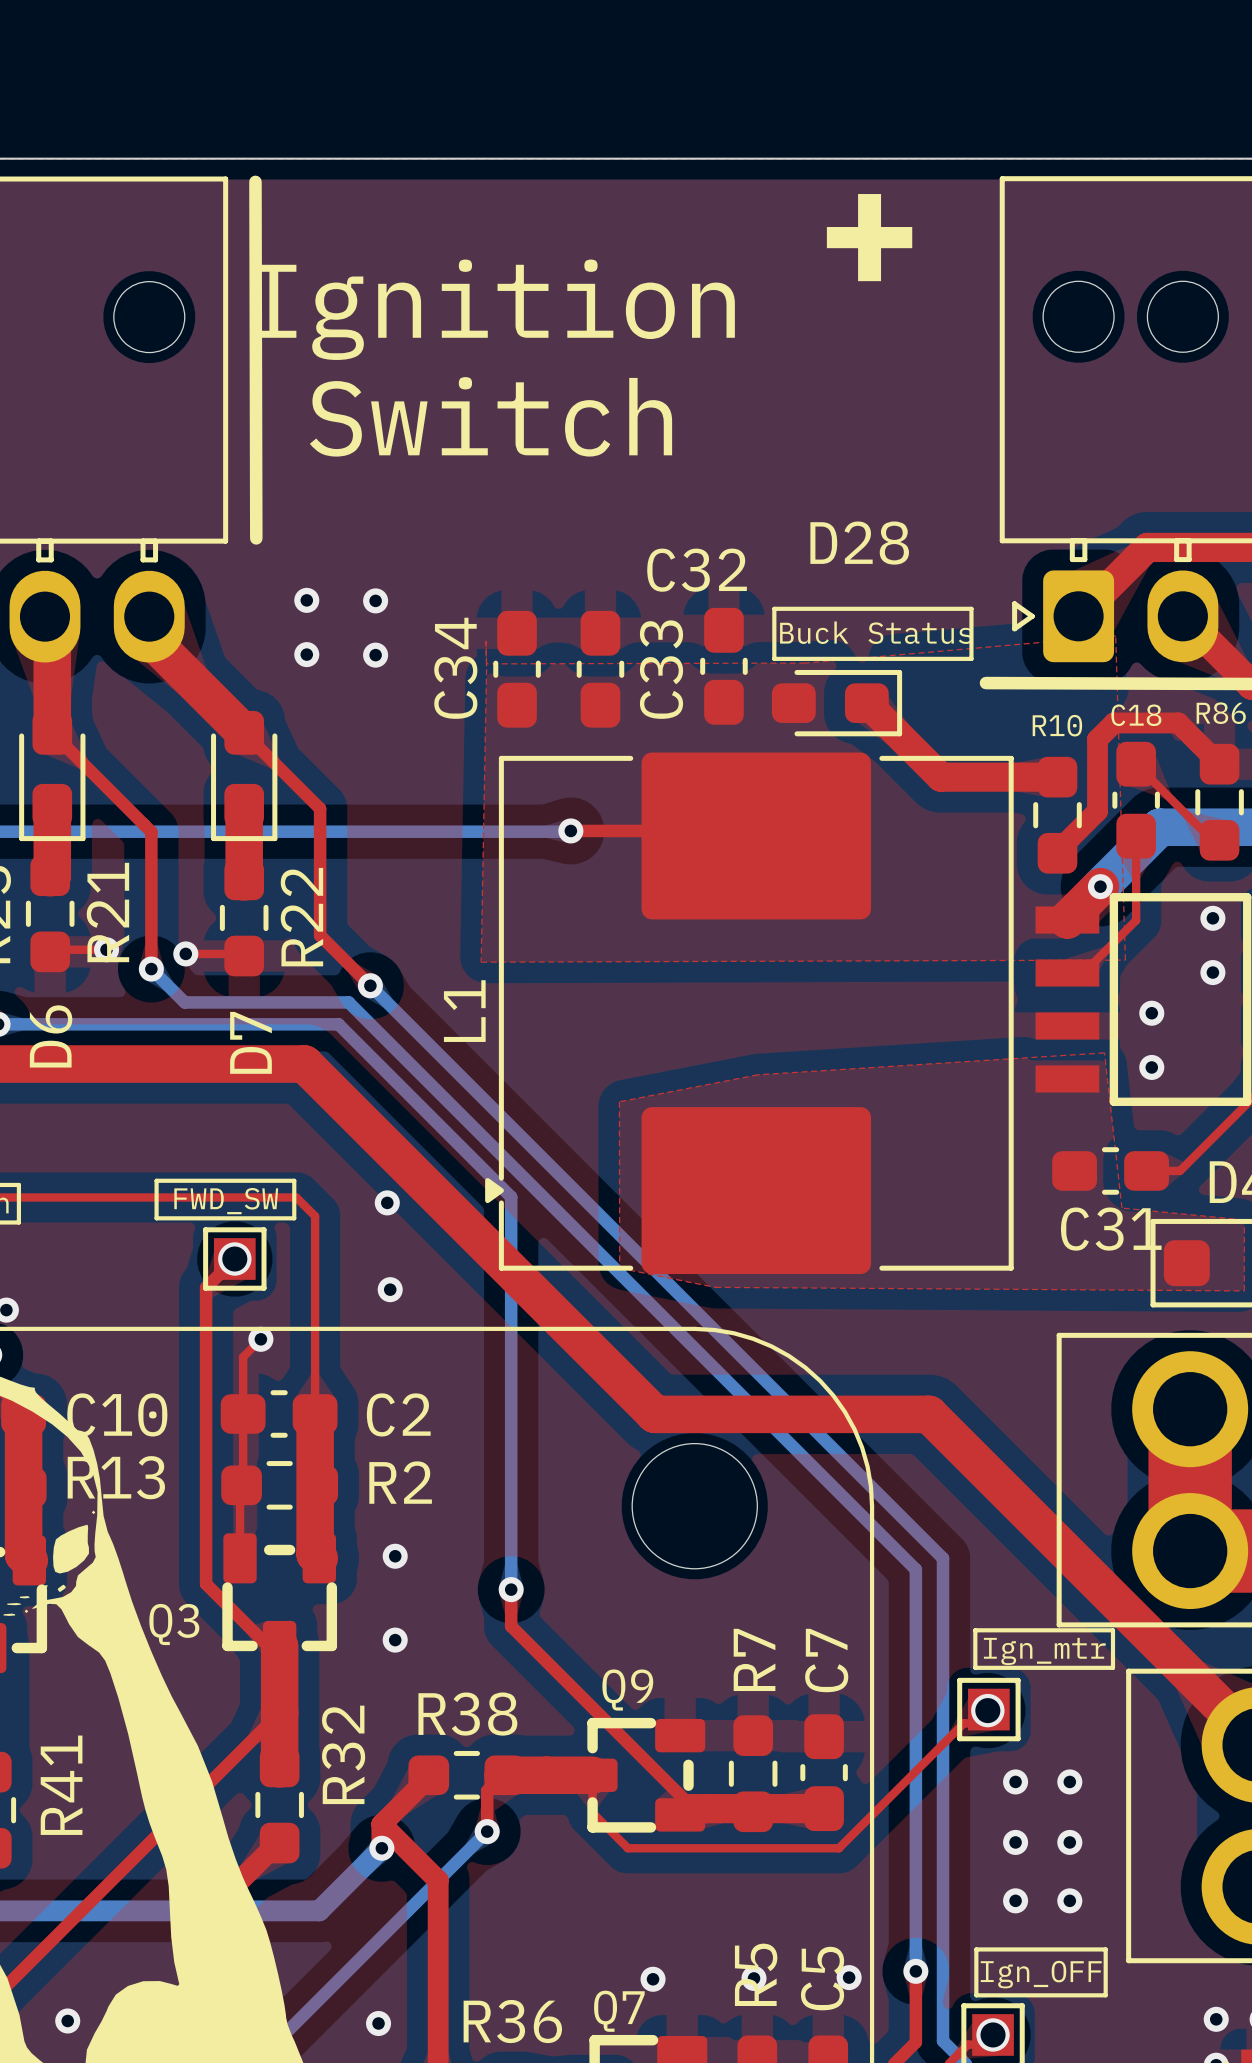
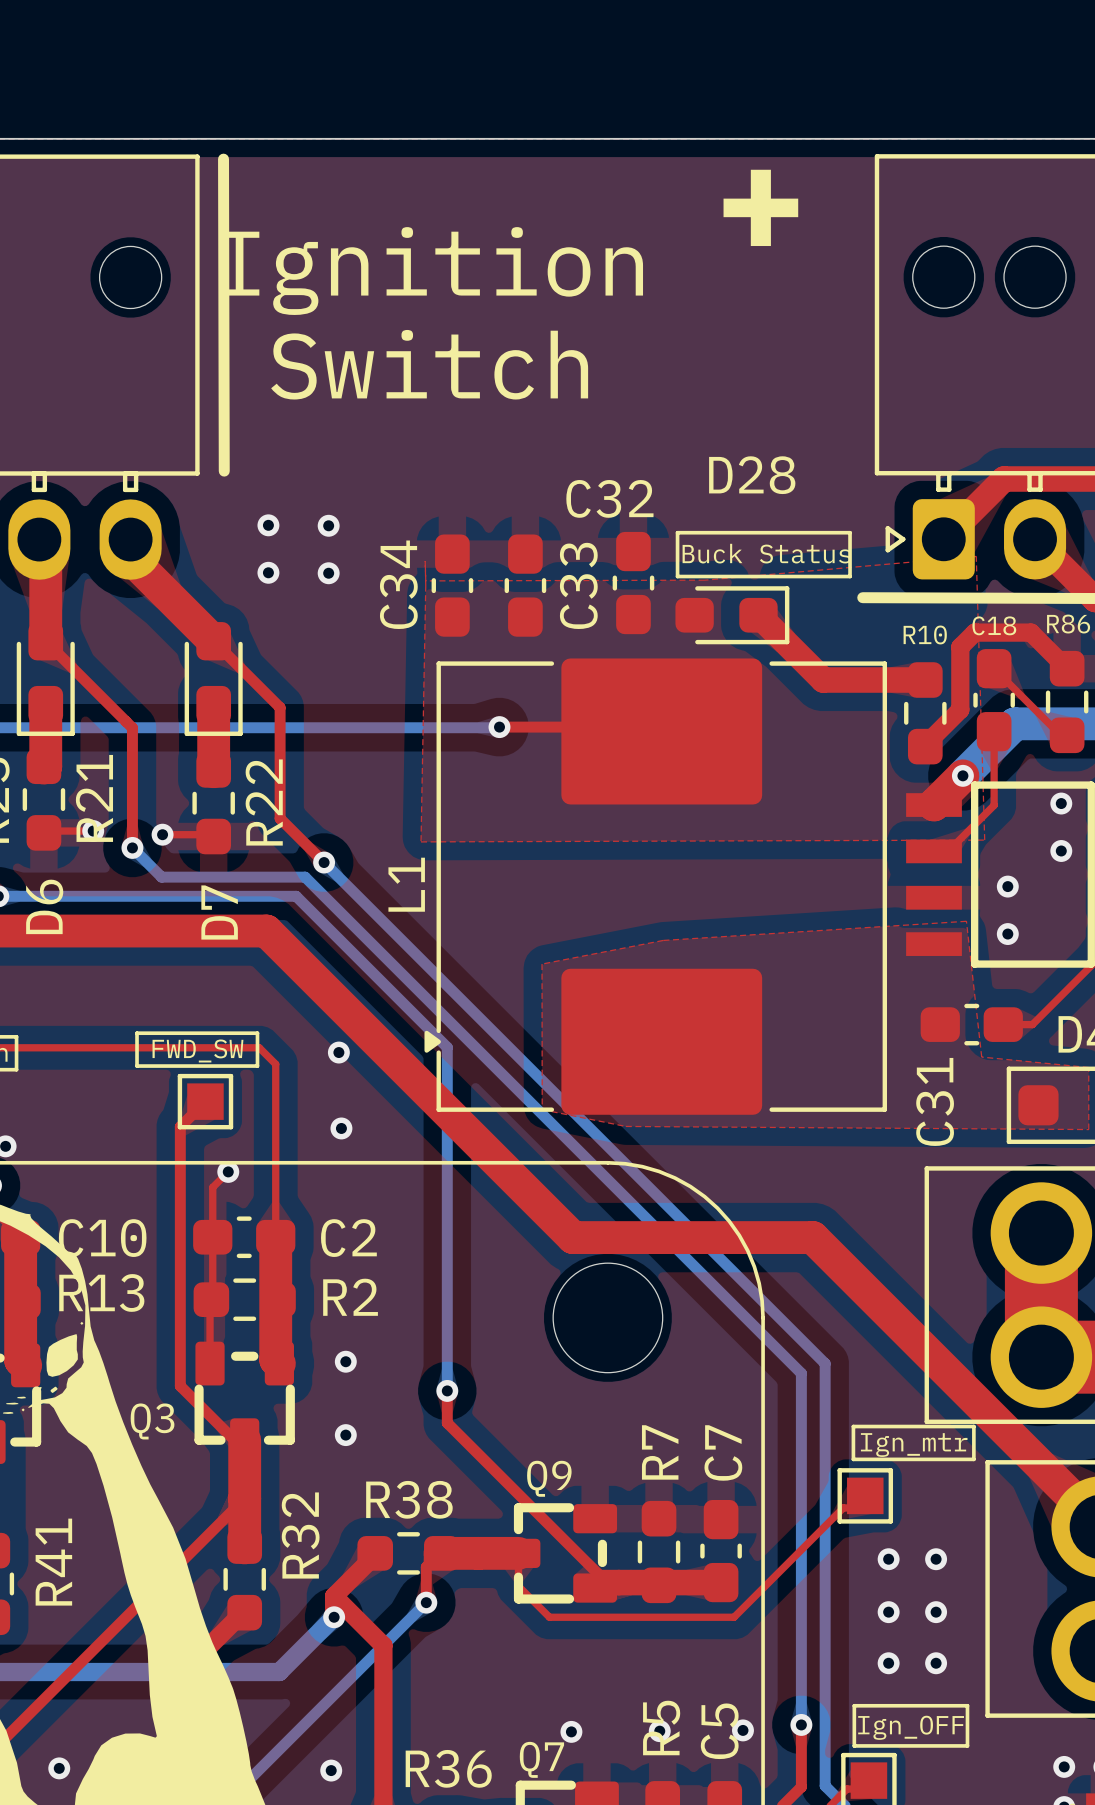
C31 name rotation: 0° (1111, 1229) -> 90° counterclockwise (935, 1101)
via: (234, 1259) -> none
via: (987, 1710) -> none
via: (993, 2034) -> none

